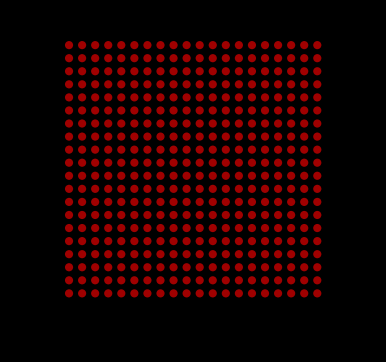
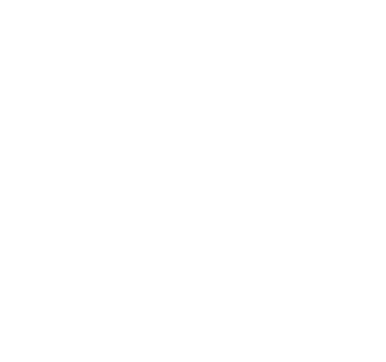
part: (193, 169) -> none

